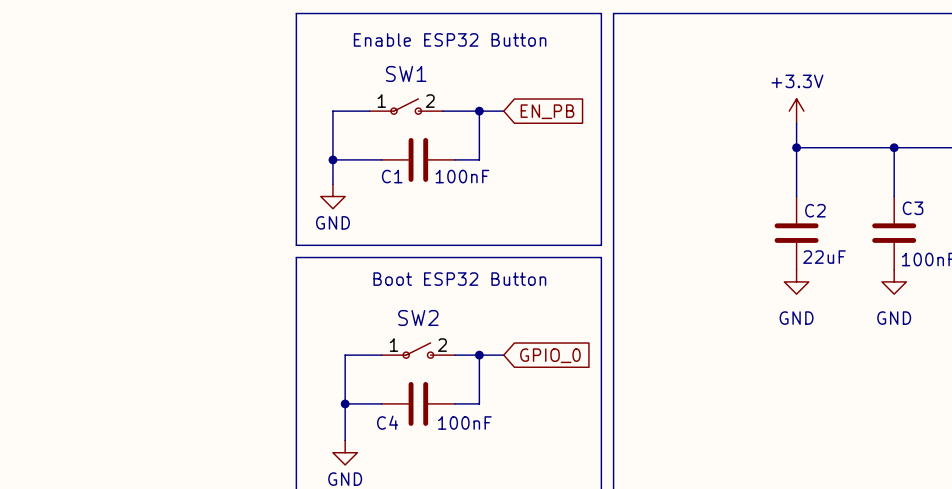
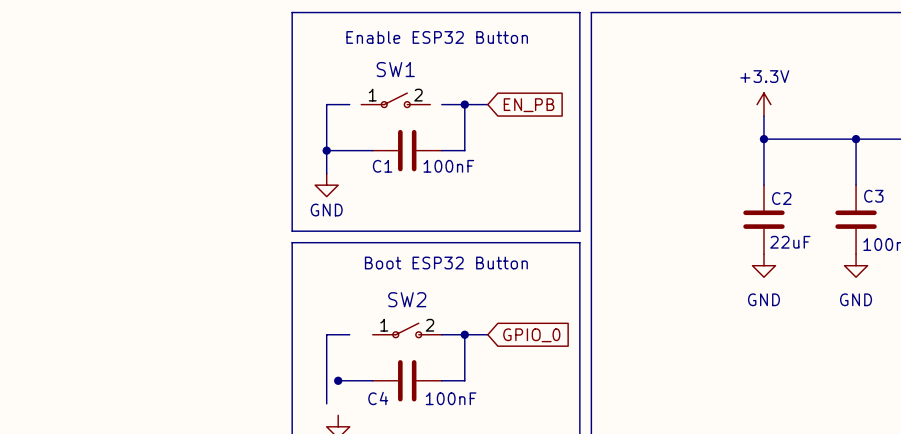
wire: (357, 111) (369, 111) -> none
wire: (442, 111) (454, 111) -> none
wire: (345, 355) (345, 440) -> (338, 334) (326, 334) (326, 403)
wire: (357, 355) (381, 355) -> none

